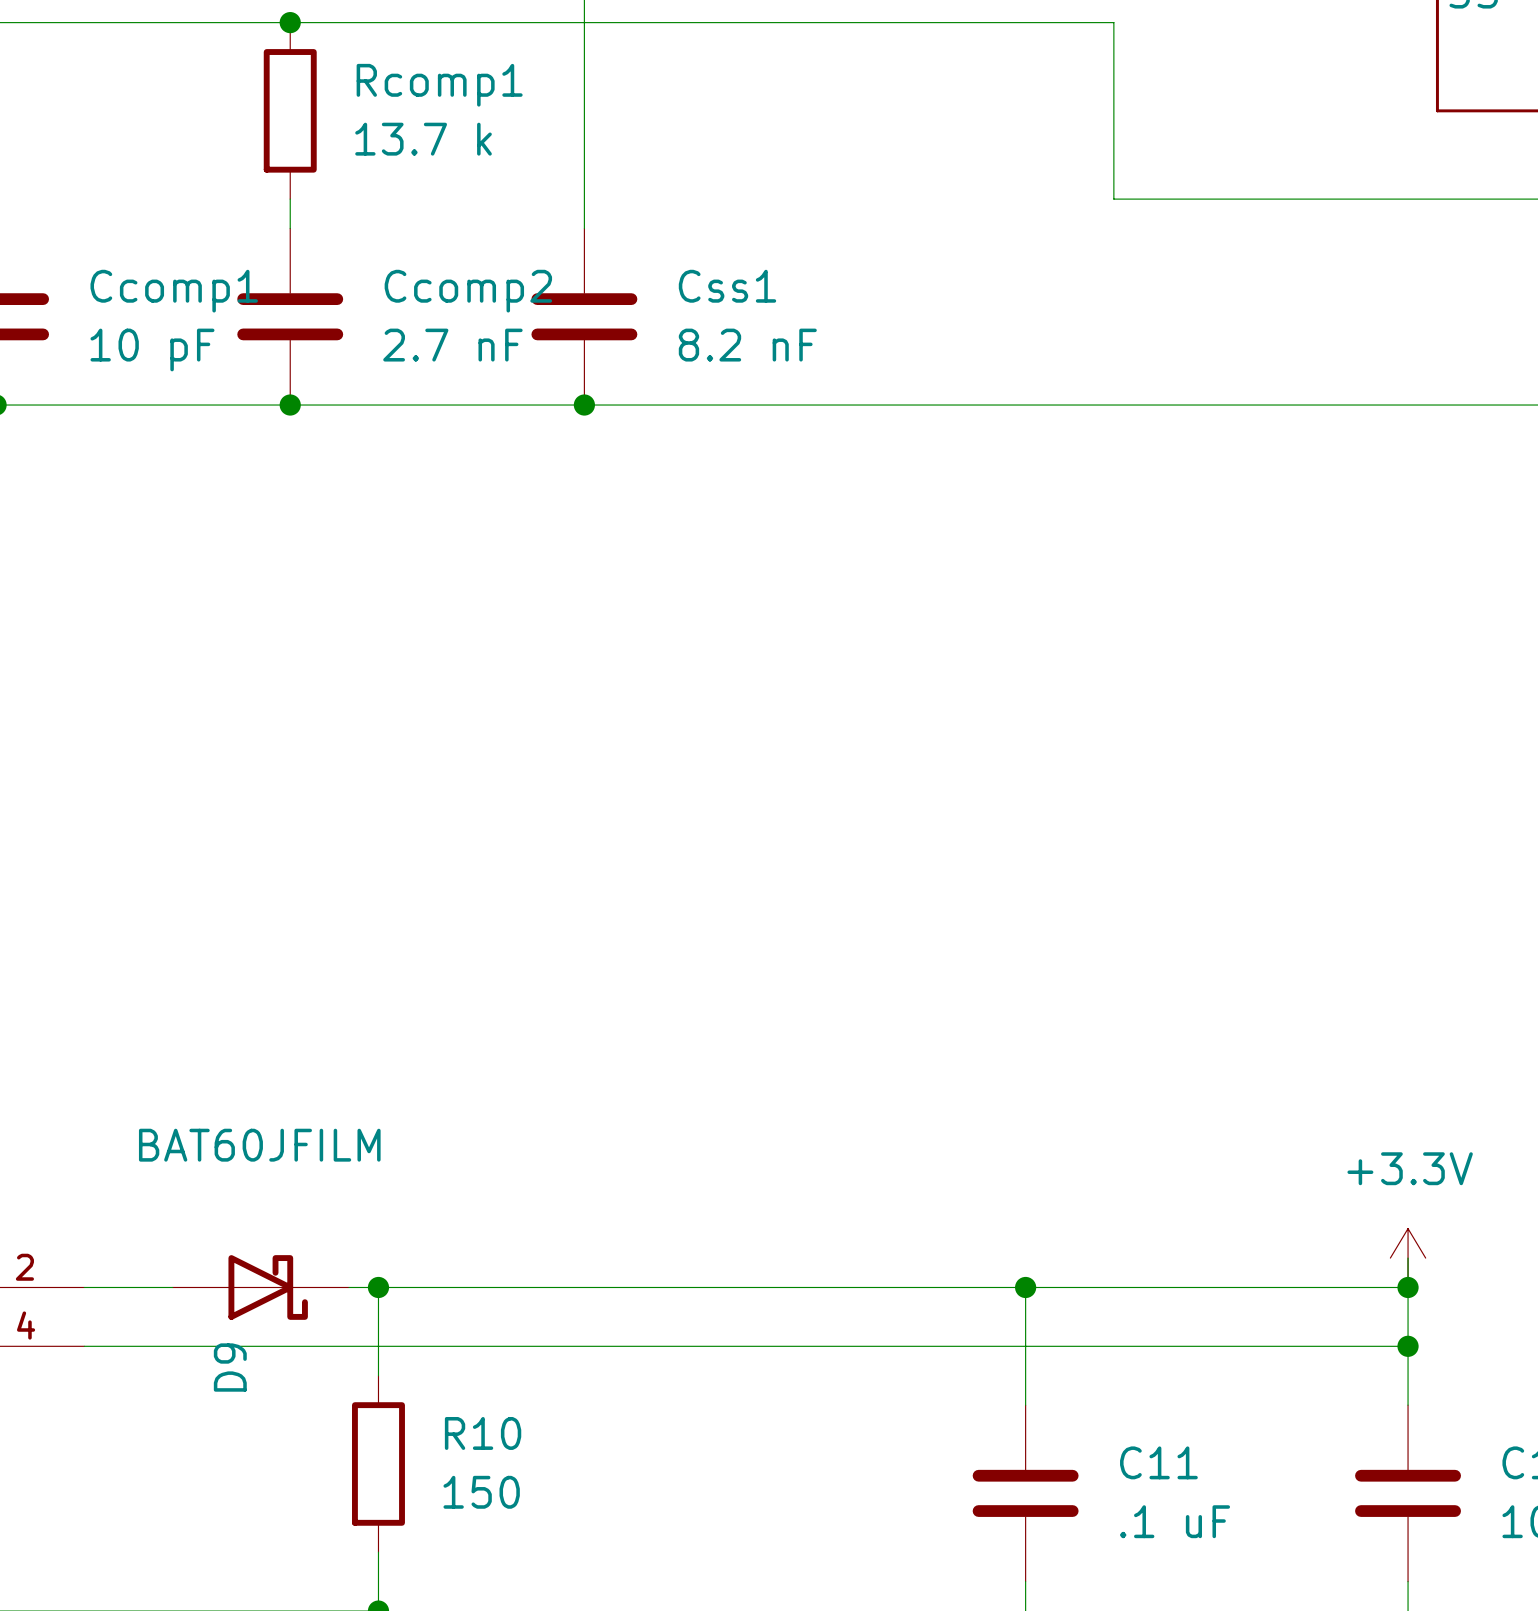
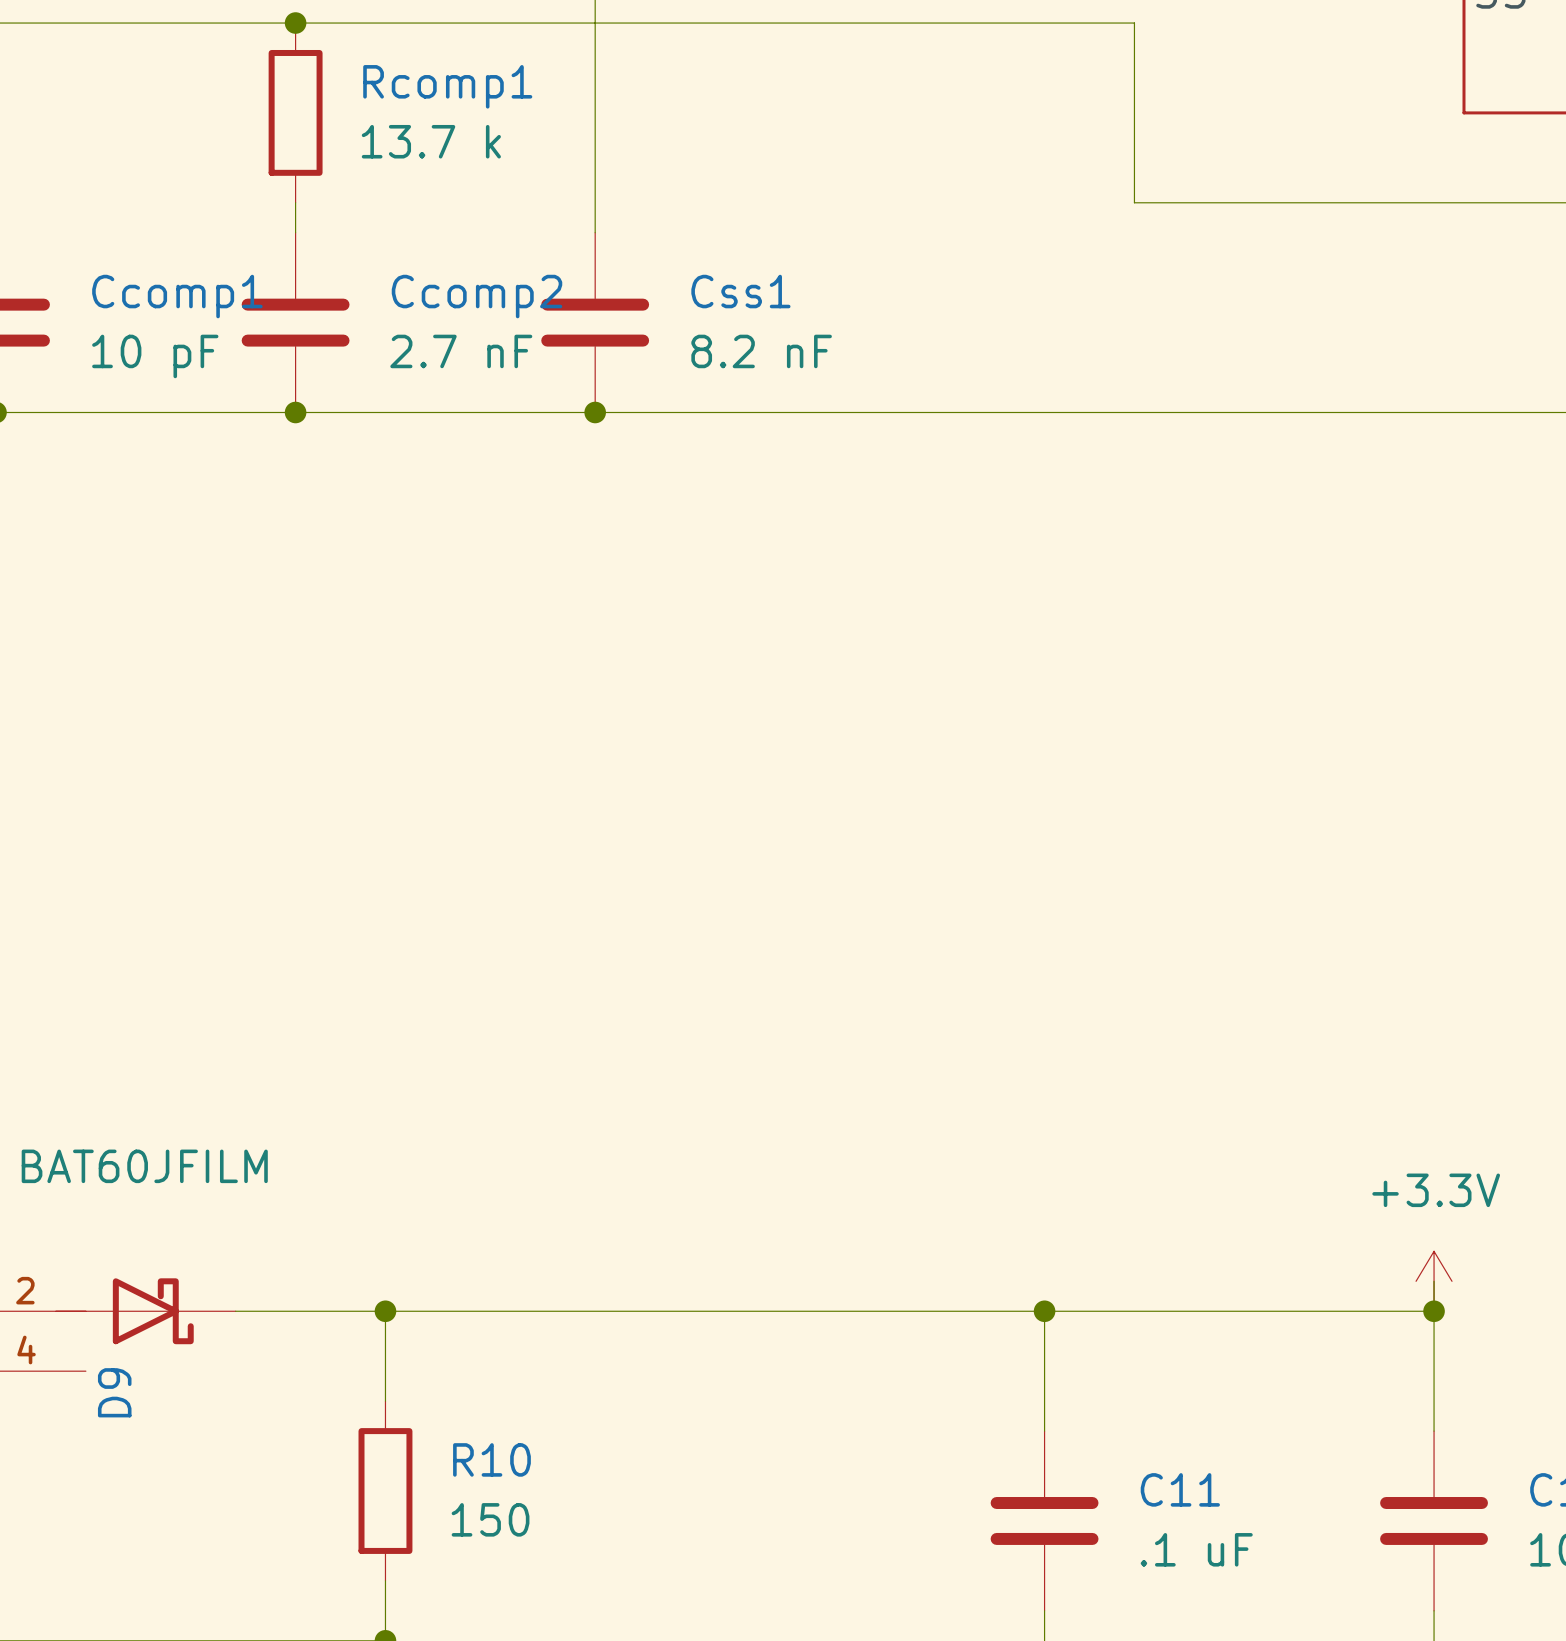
D9 position: (260, 1287) -> (145, 1311)
wire: (84, 1346) (1408, 1346) -> none
junction: (1408, 1346) -> none

